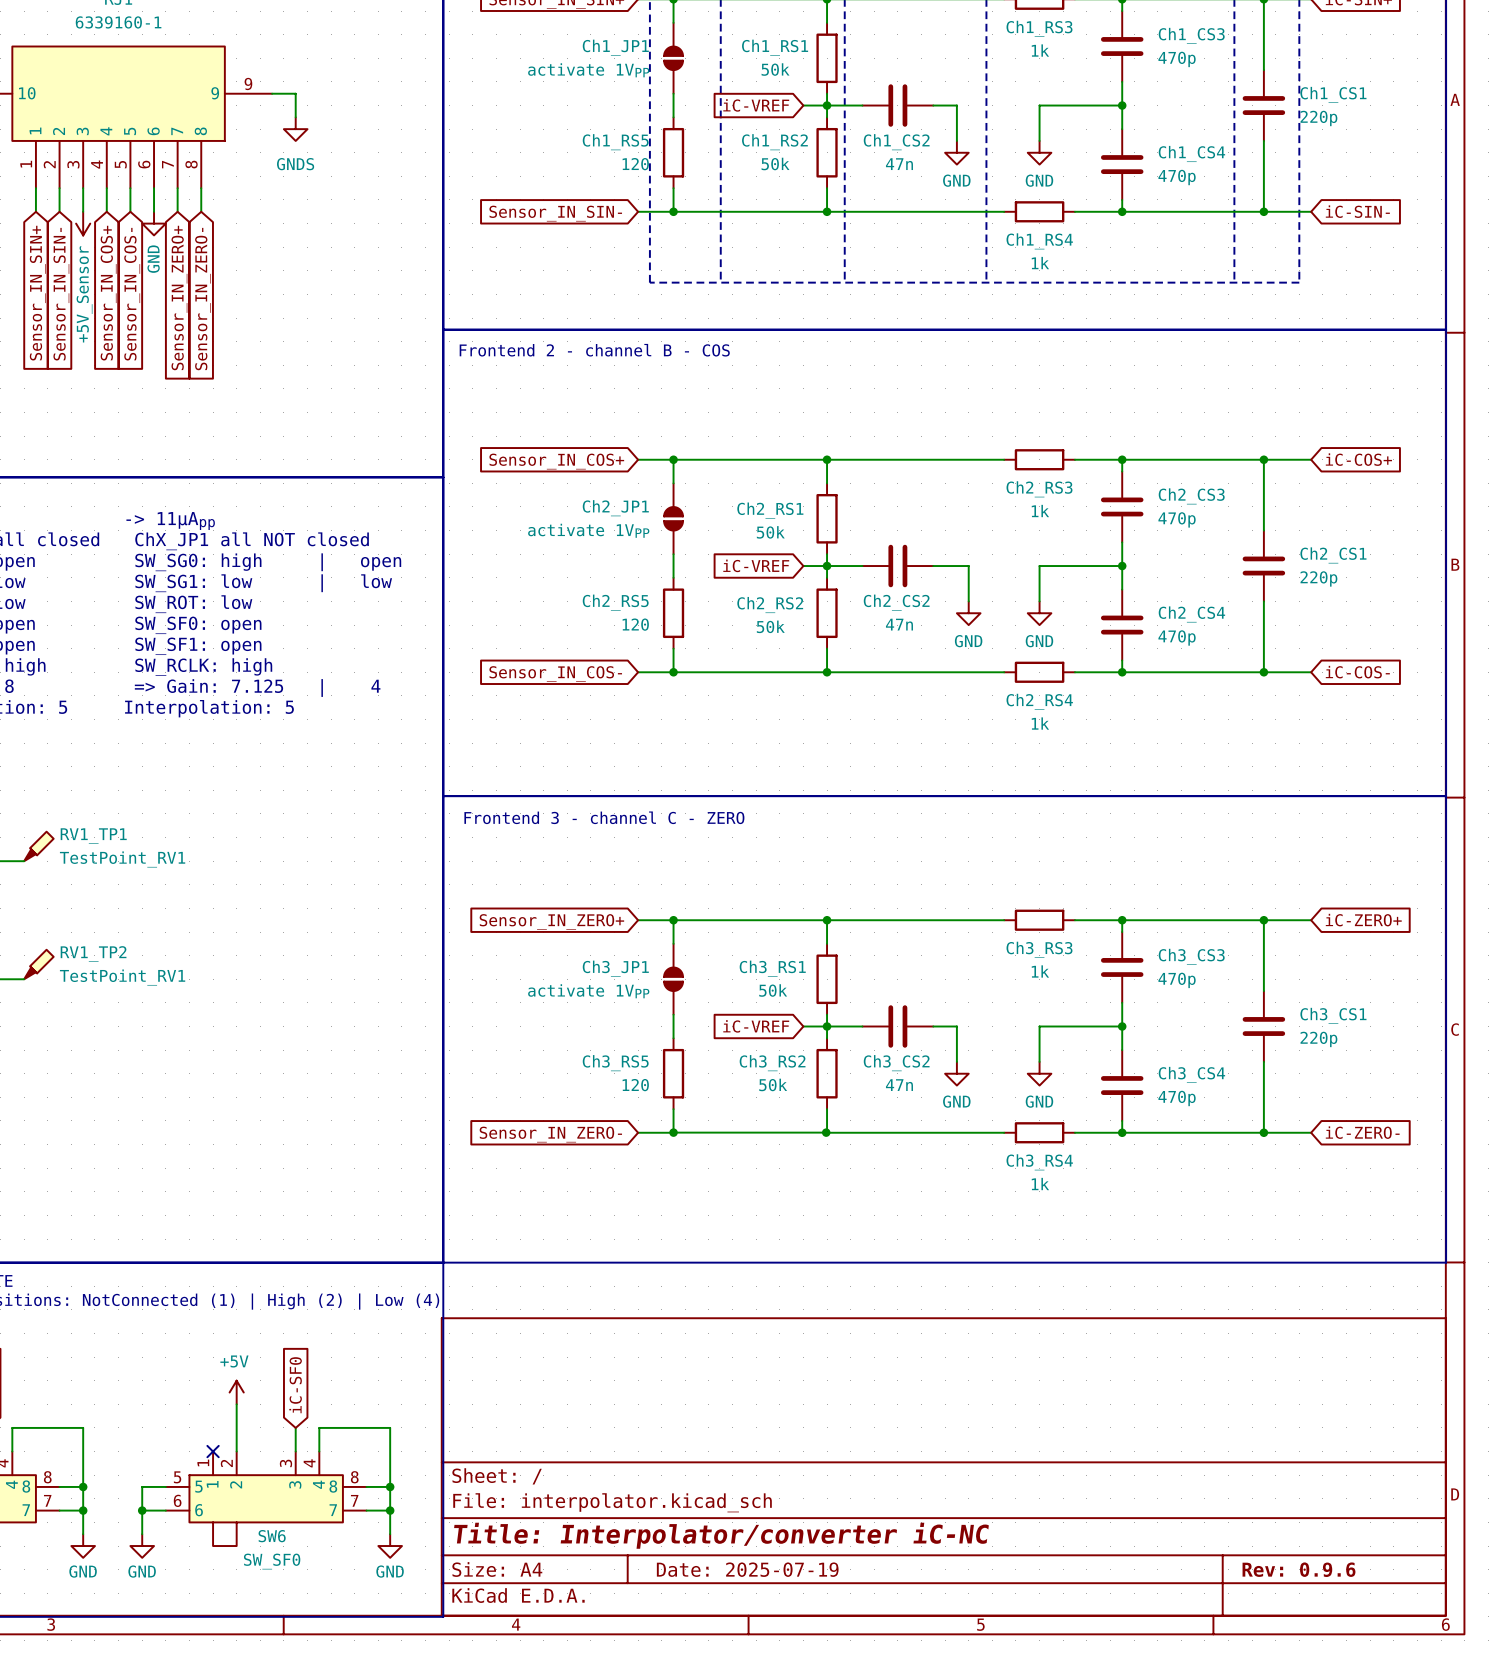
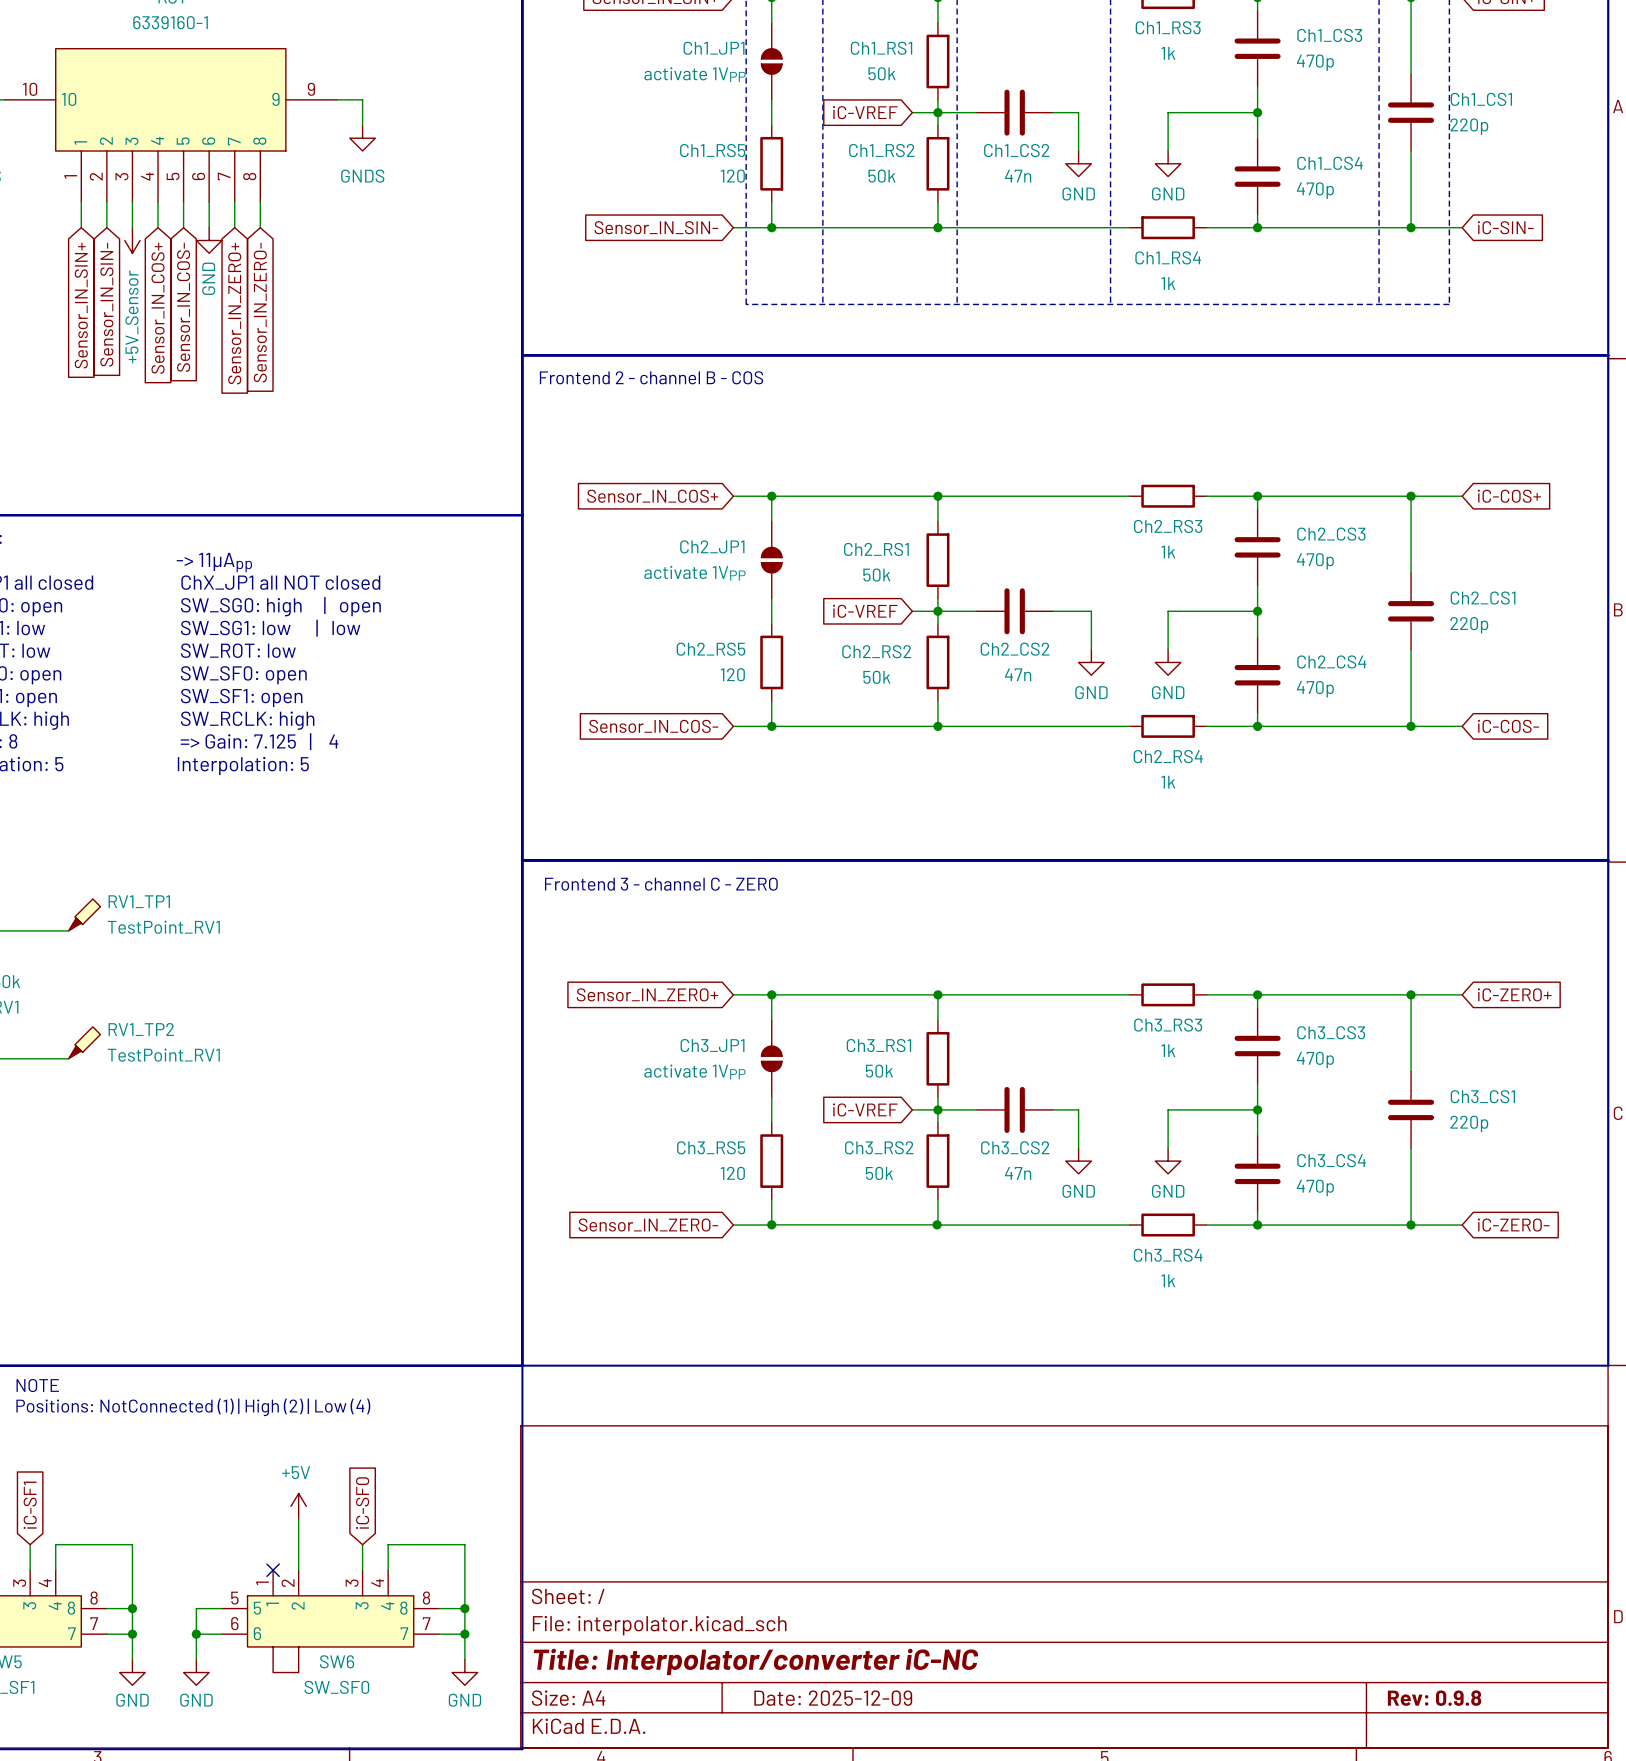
title block: Date: 2025-07-19 (747, 1569) -> Date: 2025-12-09 (833, 1698)
title block: Rev: 0.9.6 (1298, 1569) -> Rev: 0.9.8 (1434, 1698)

